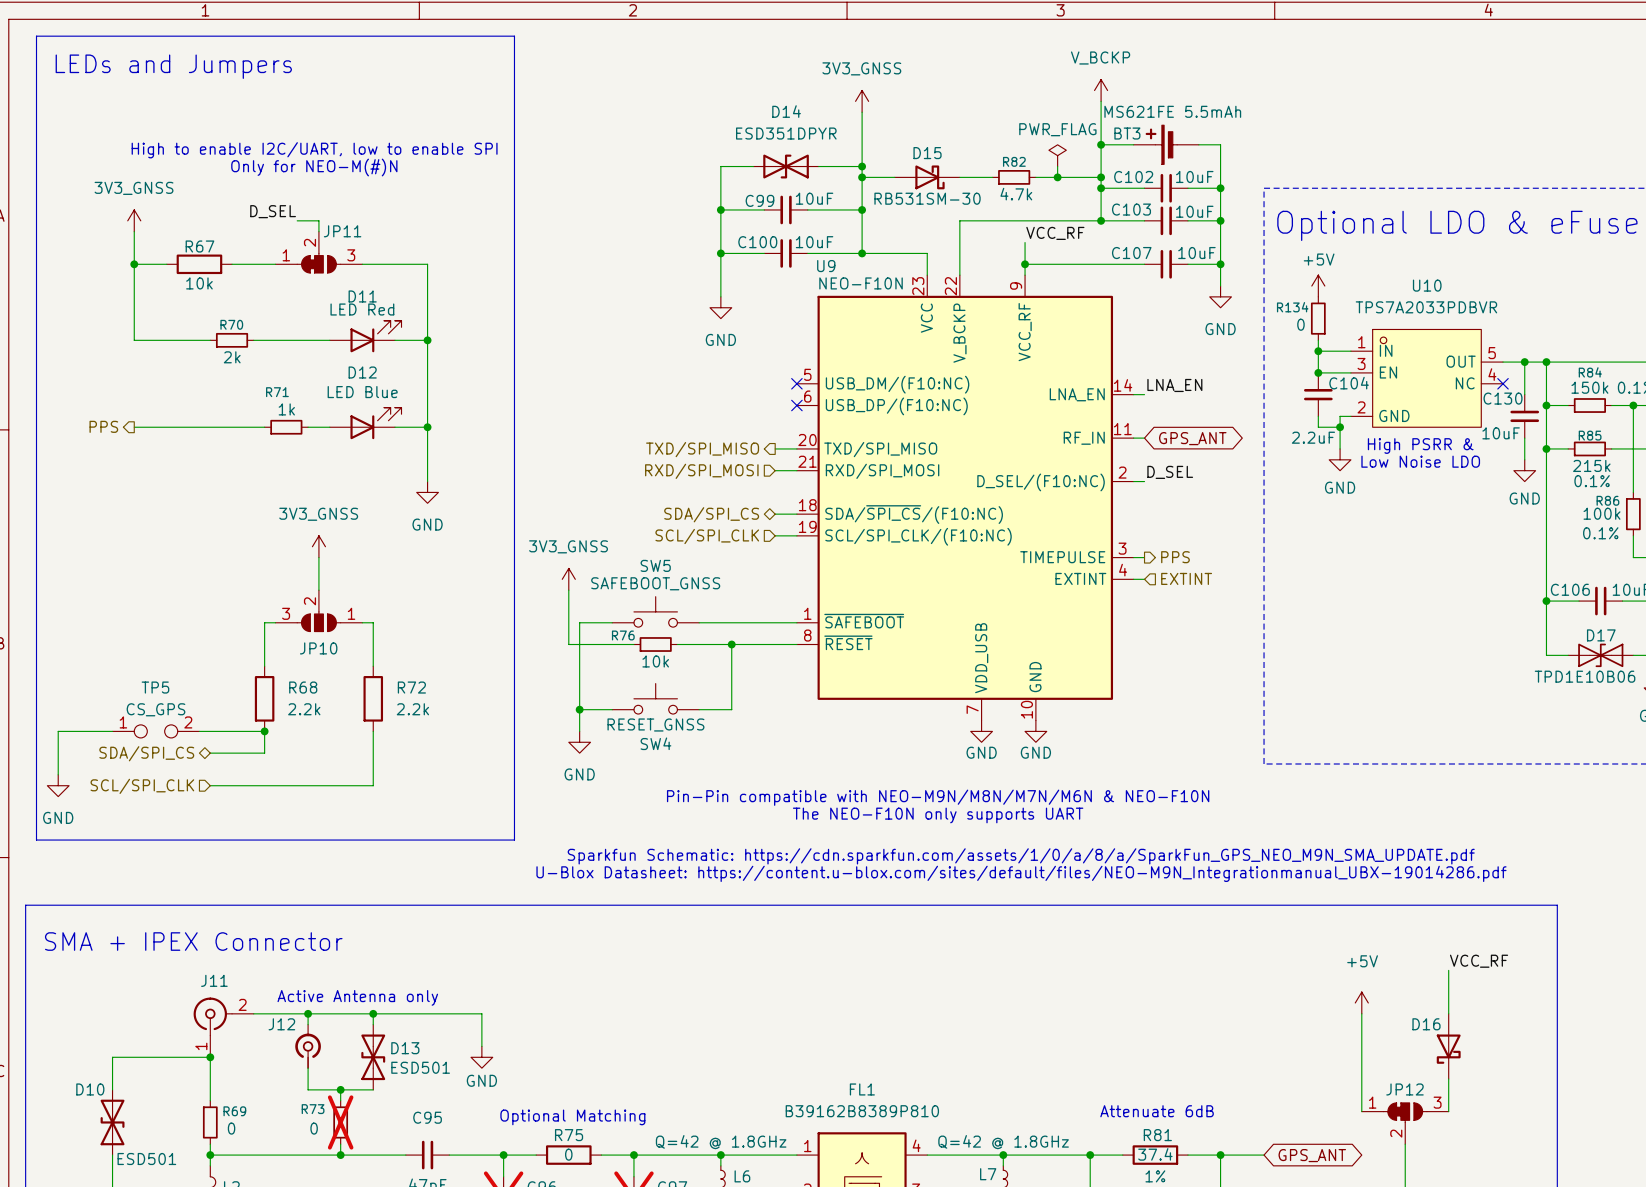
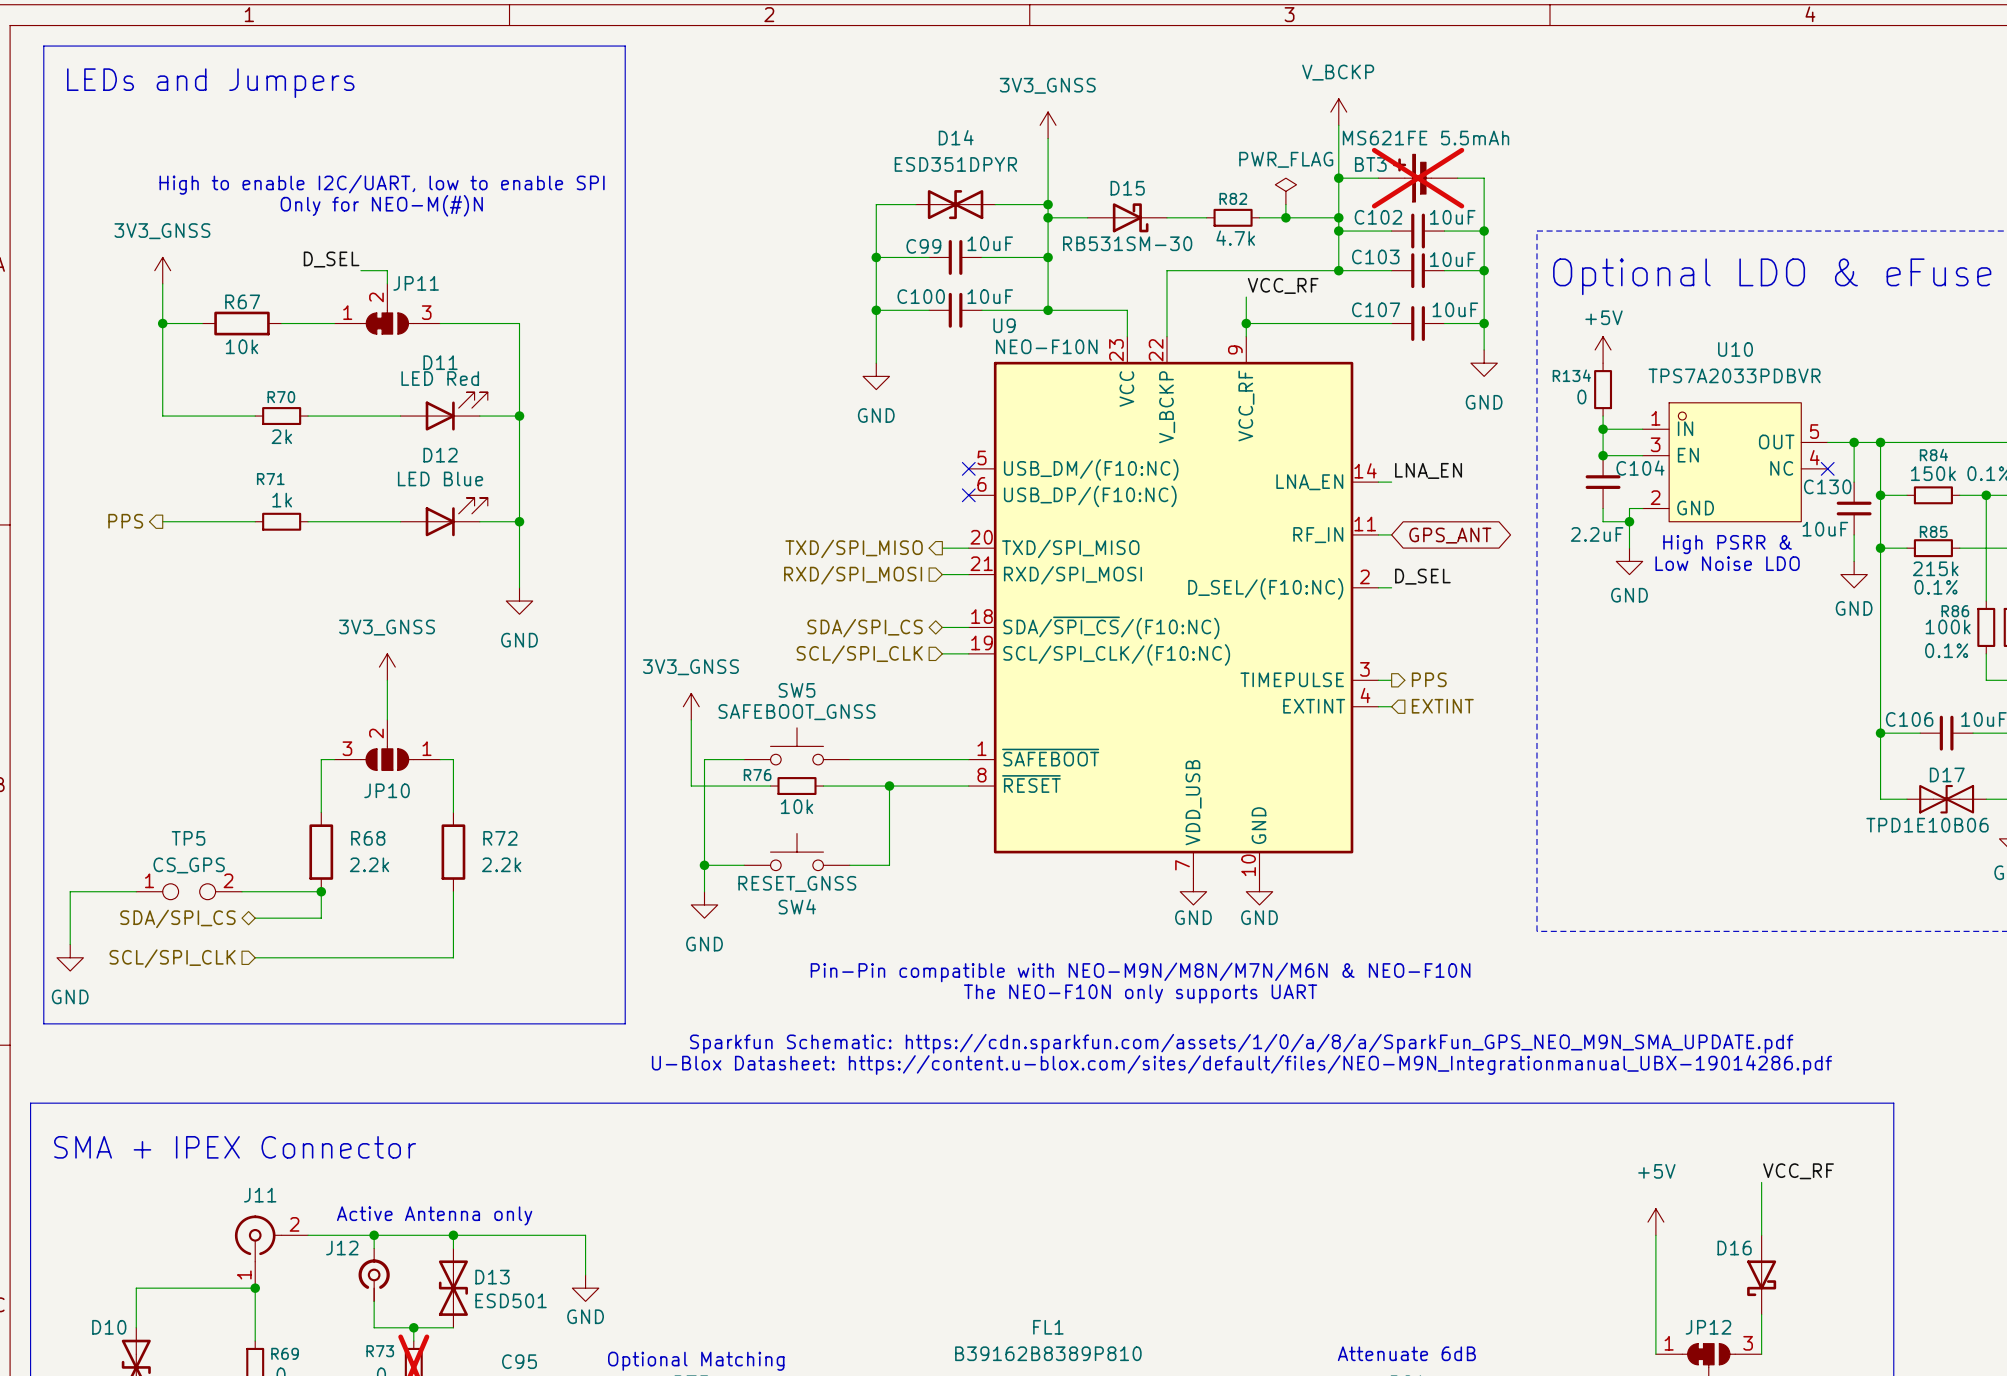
BT3 do-not-place cross: none -> (1418, 178)
wire: (210, 427) (253, 427) -> (321, 521) (374, 521)
R71 position: (286, 427) -> (281, 521)

